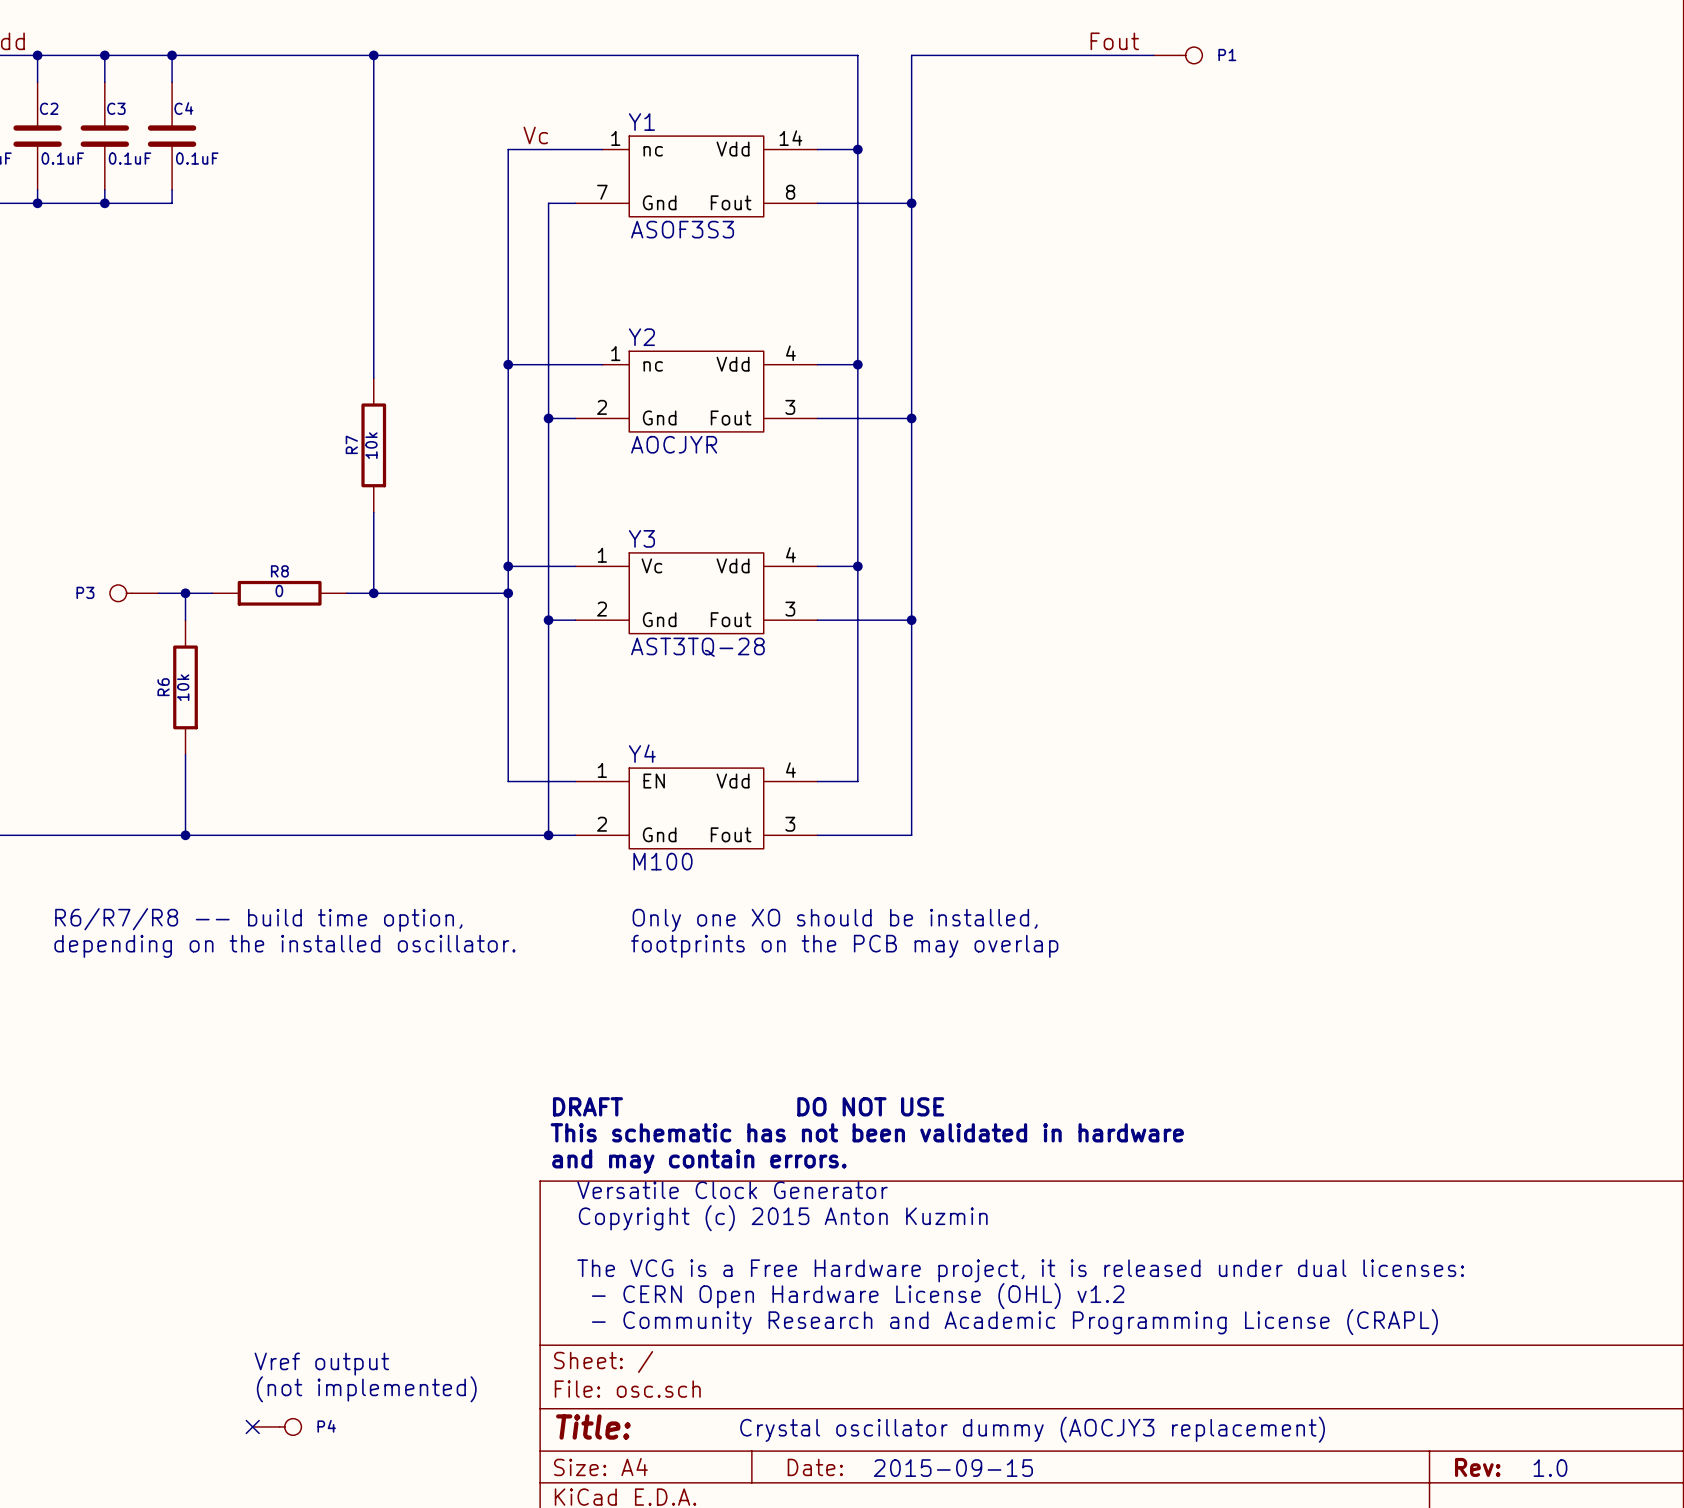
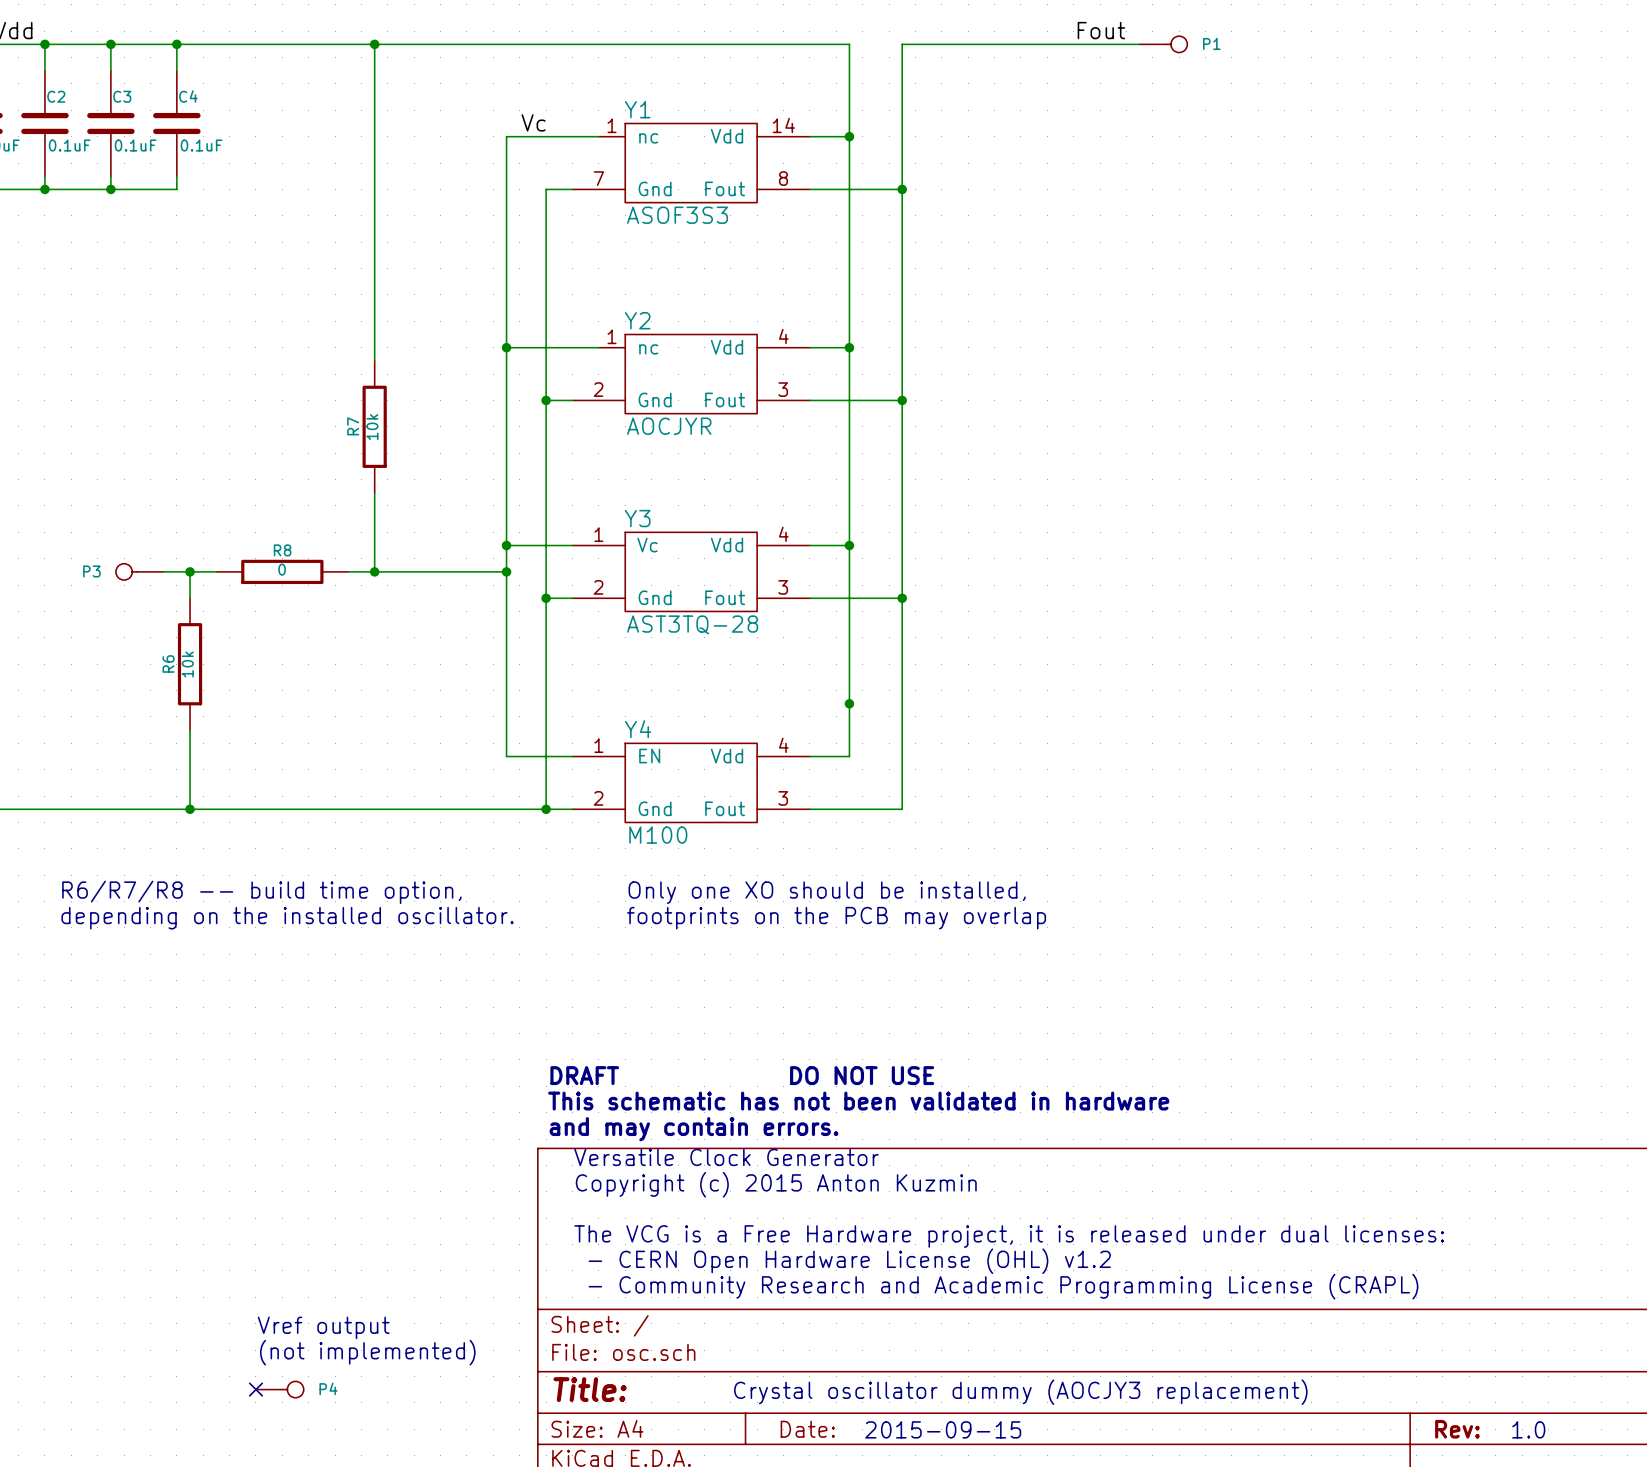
junction: none -> (849, 703)

